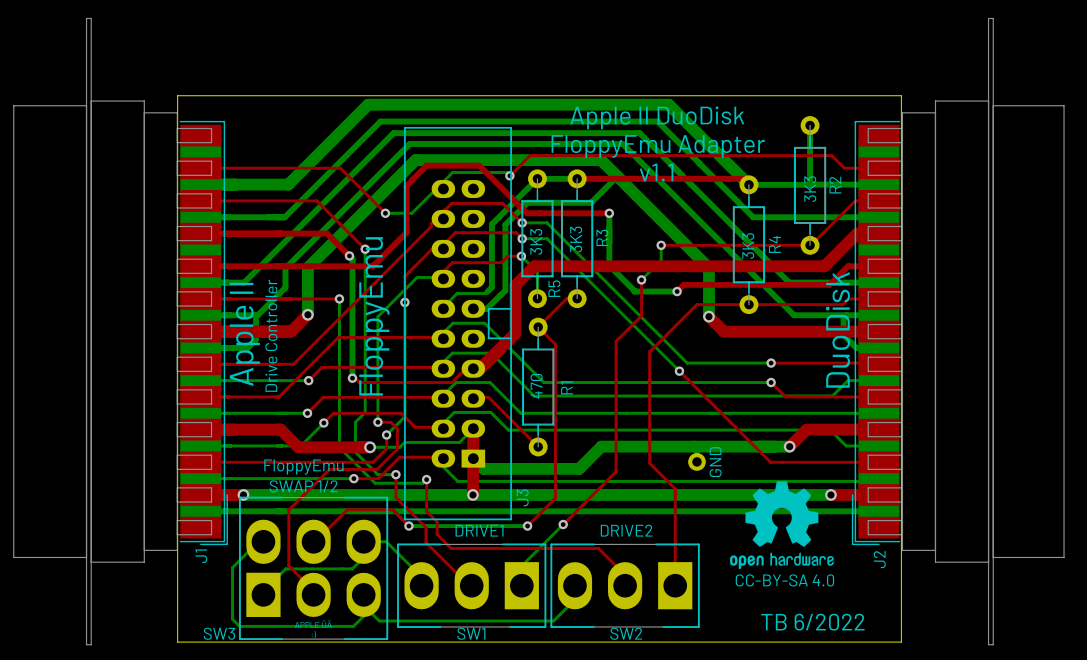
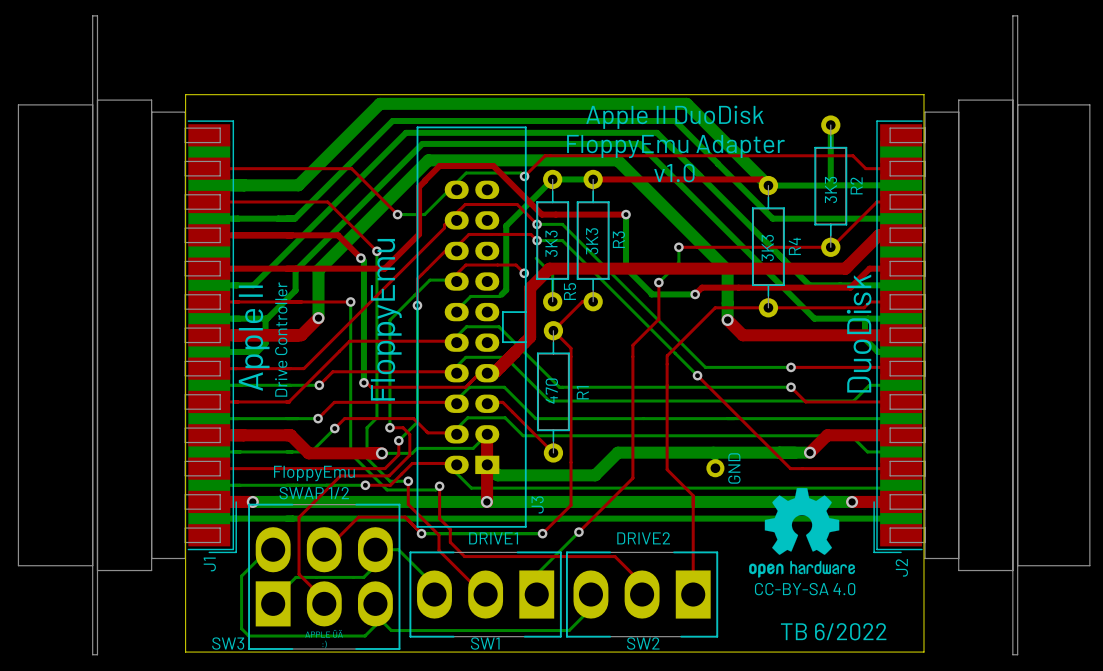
text: v1.1 (656, 172) -> v1.0 (674, 173)
bottom track: (617, 176) (591, 202) (527, 202) (505, 224) (505, 290) (486, 308) (473, 308) -> none
top track: (521, 256) (507, 256) (501, 262) -> (524, 273) (516, 265)
via position: (521, 256) -> (524, 273)

